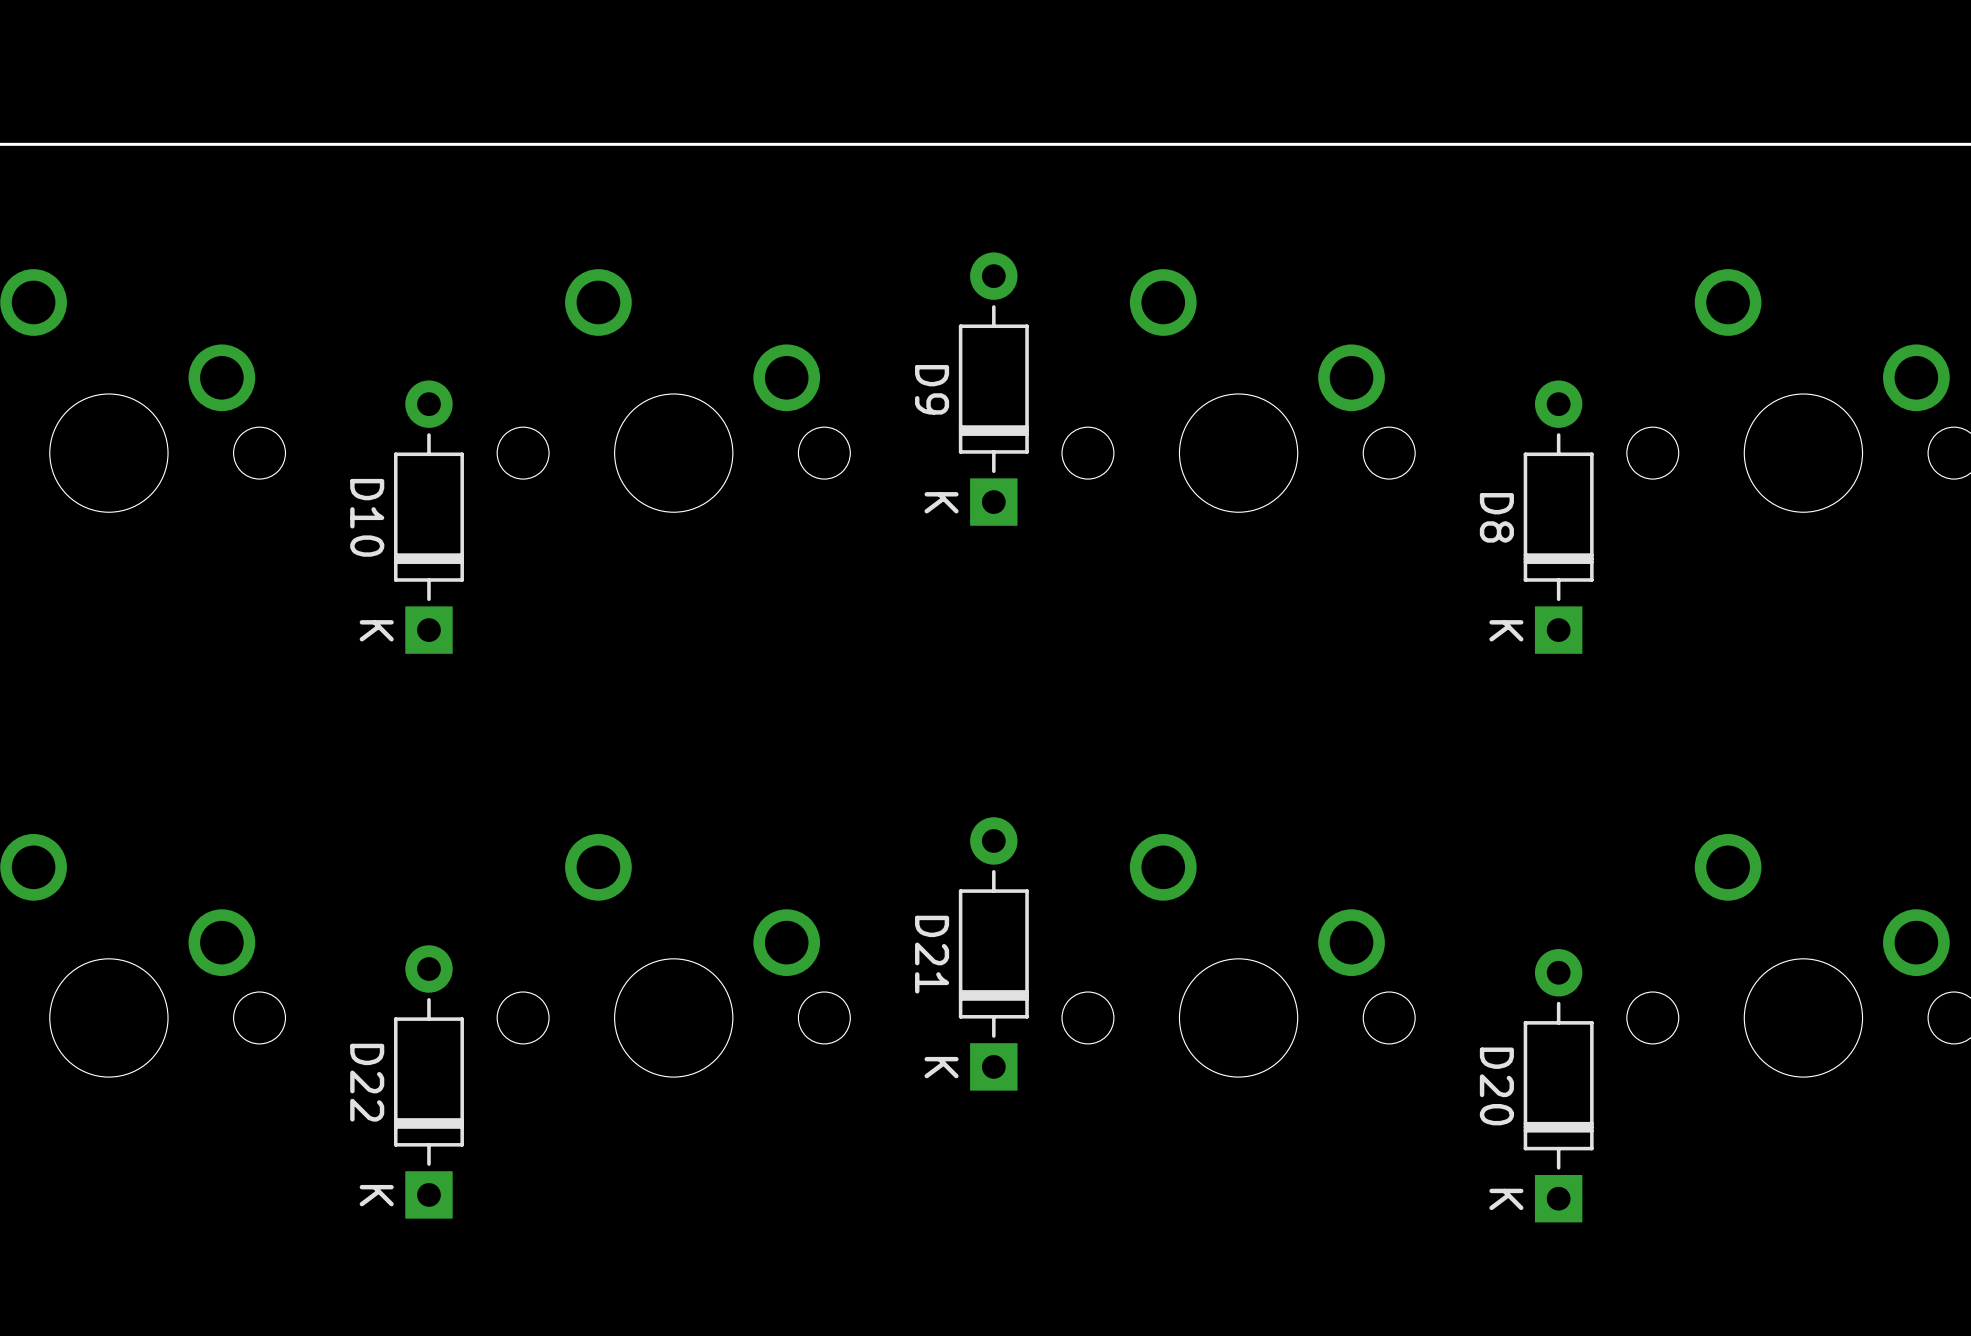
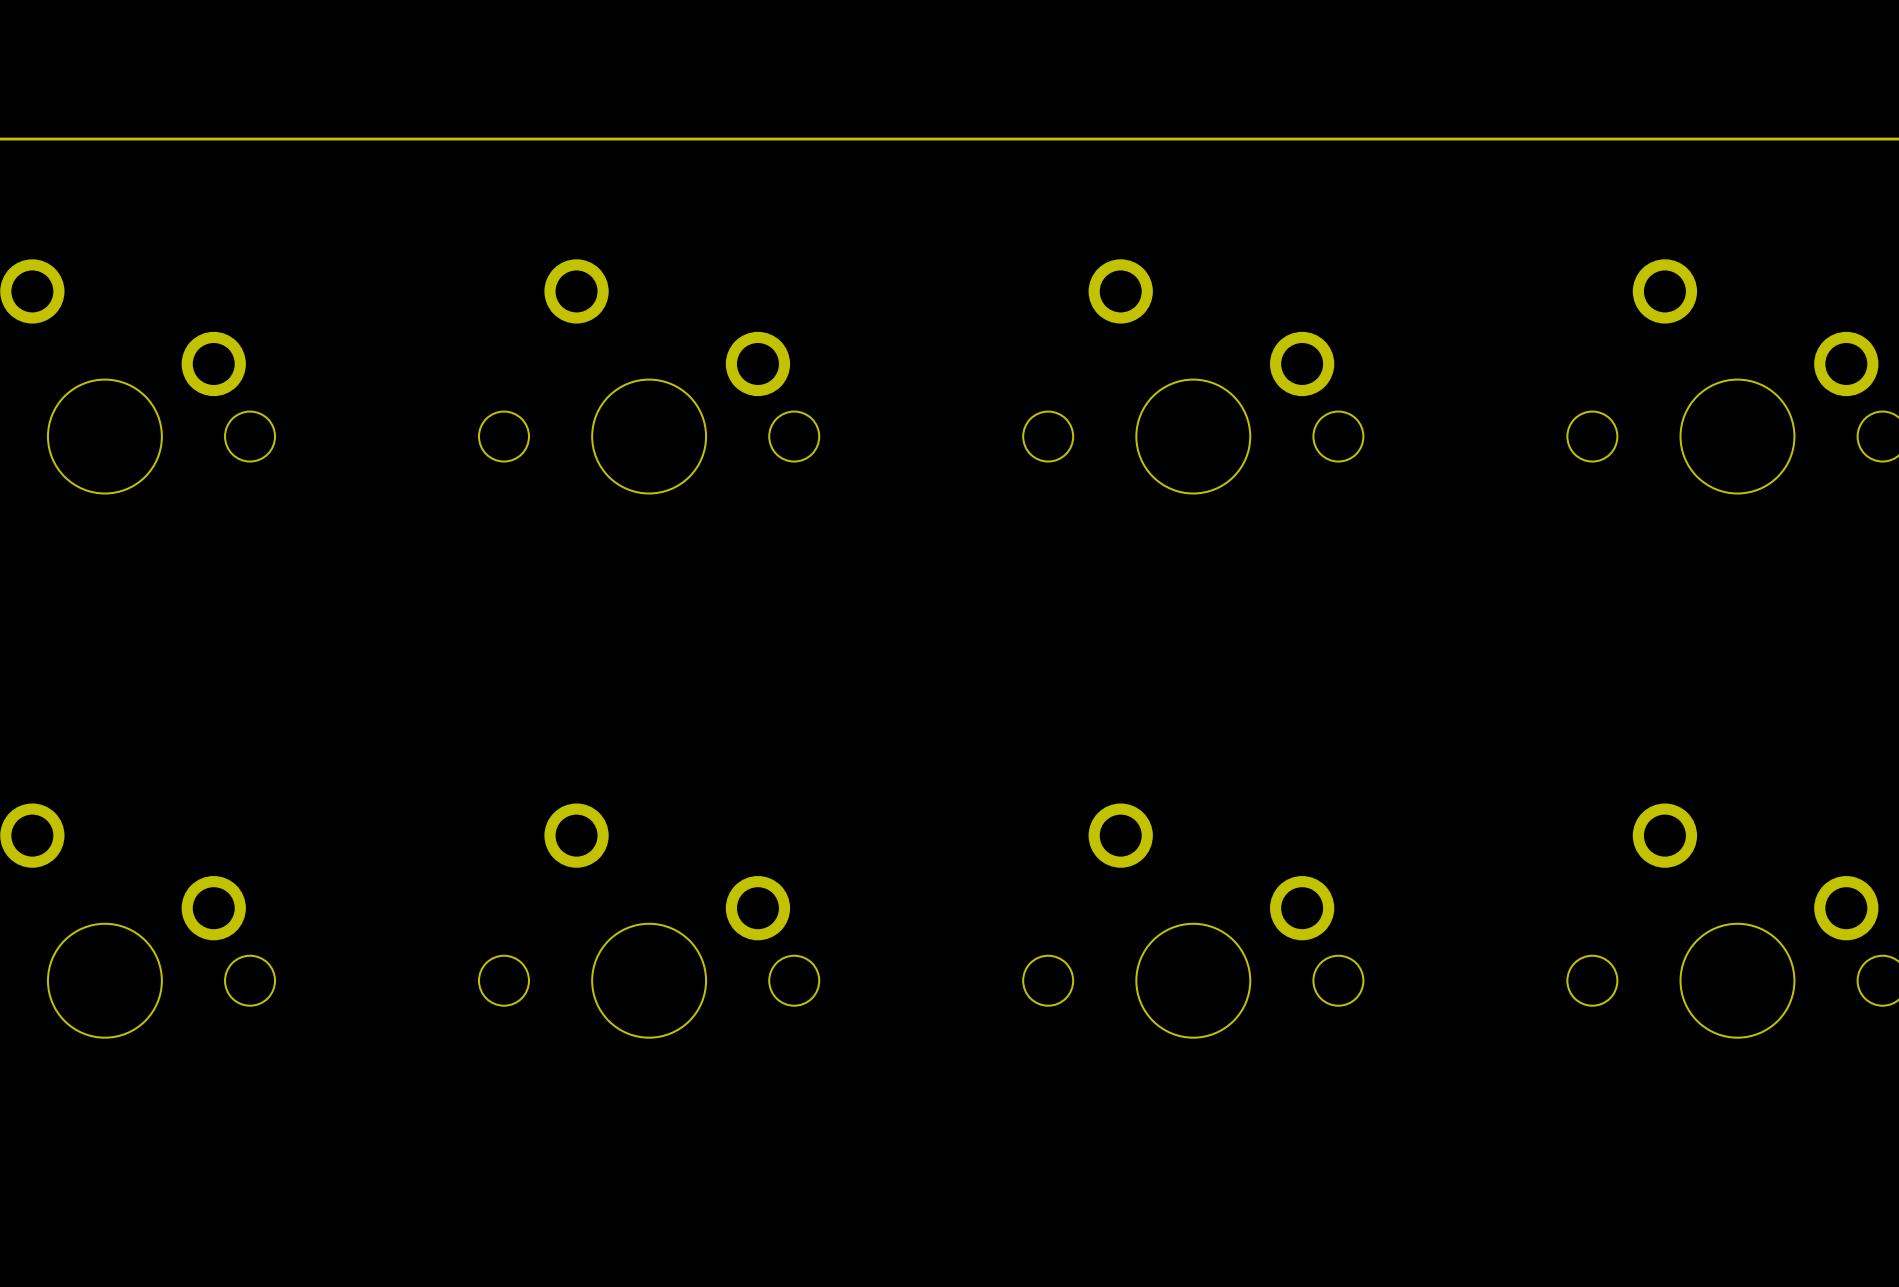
D9: (993, 389) -> none
D10: (428, 517) -> none
D8: (1558, 517) -> none
D21: (993, 953) -> none
D22: (428, 1081) -> none
D20: (1558, 1085) -> none

